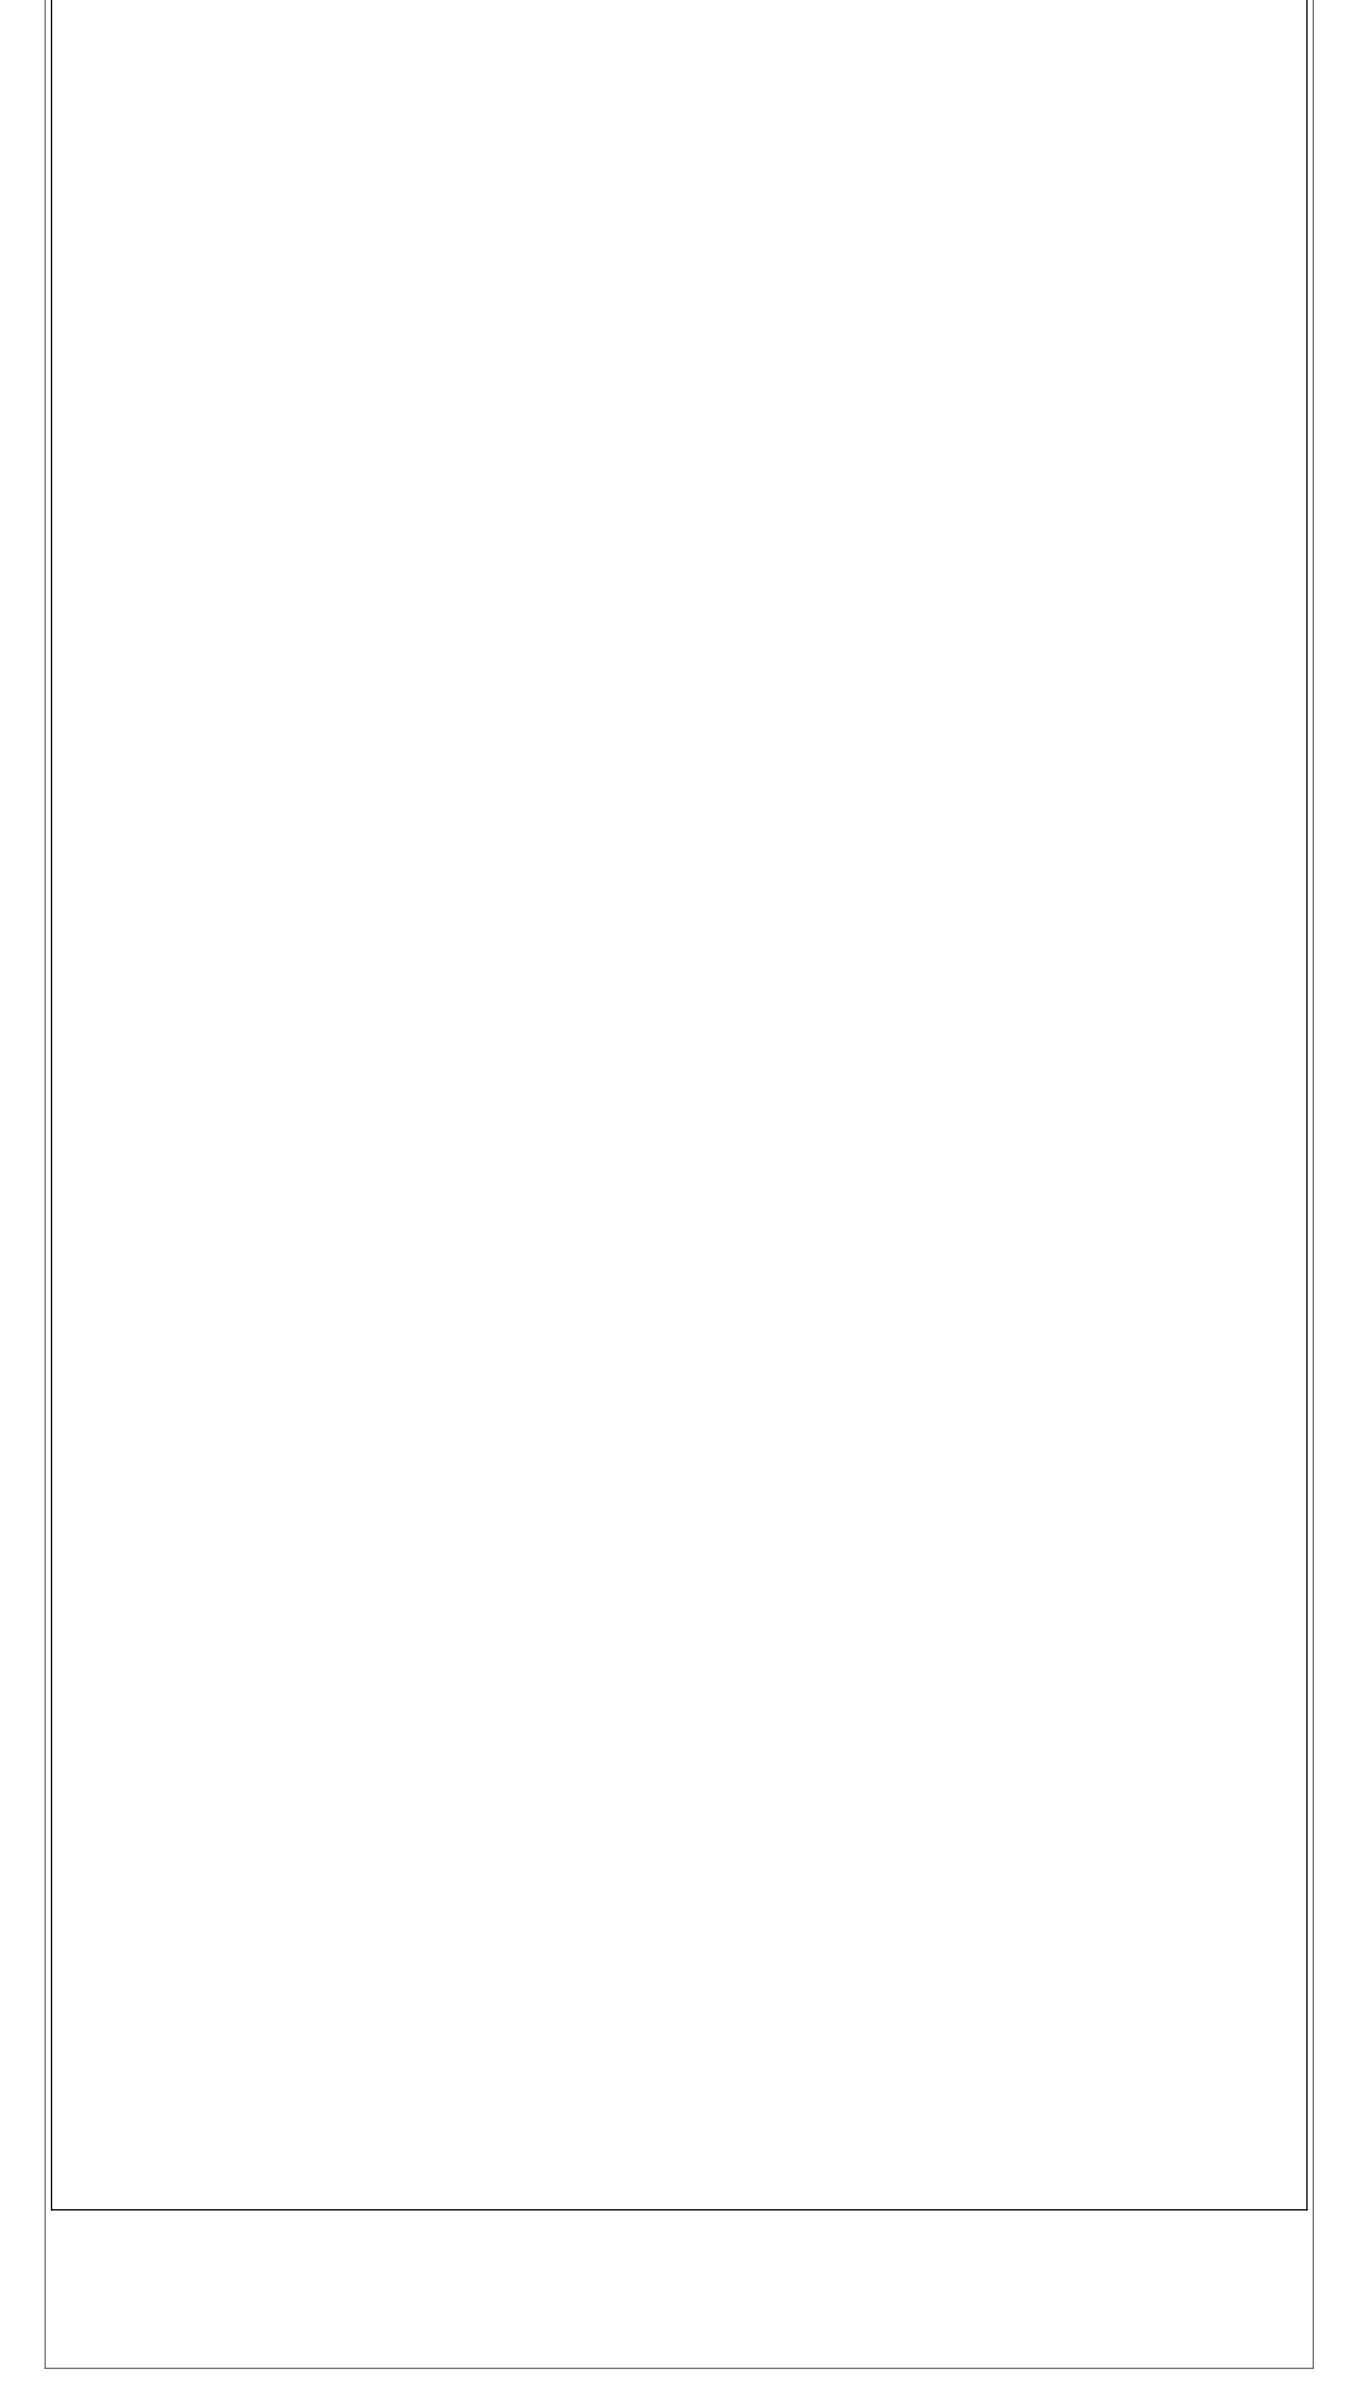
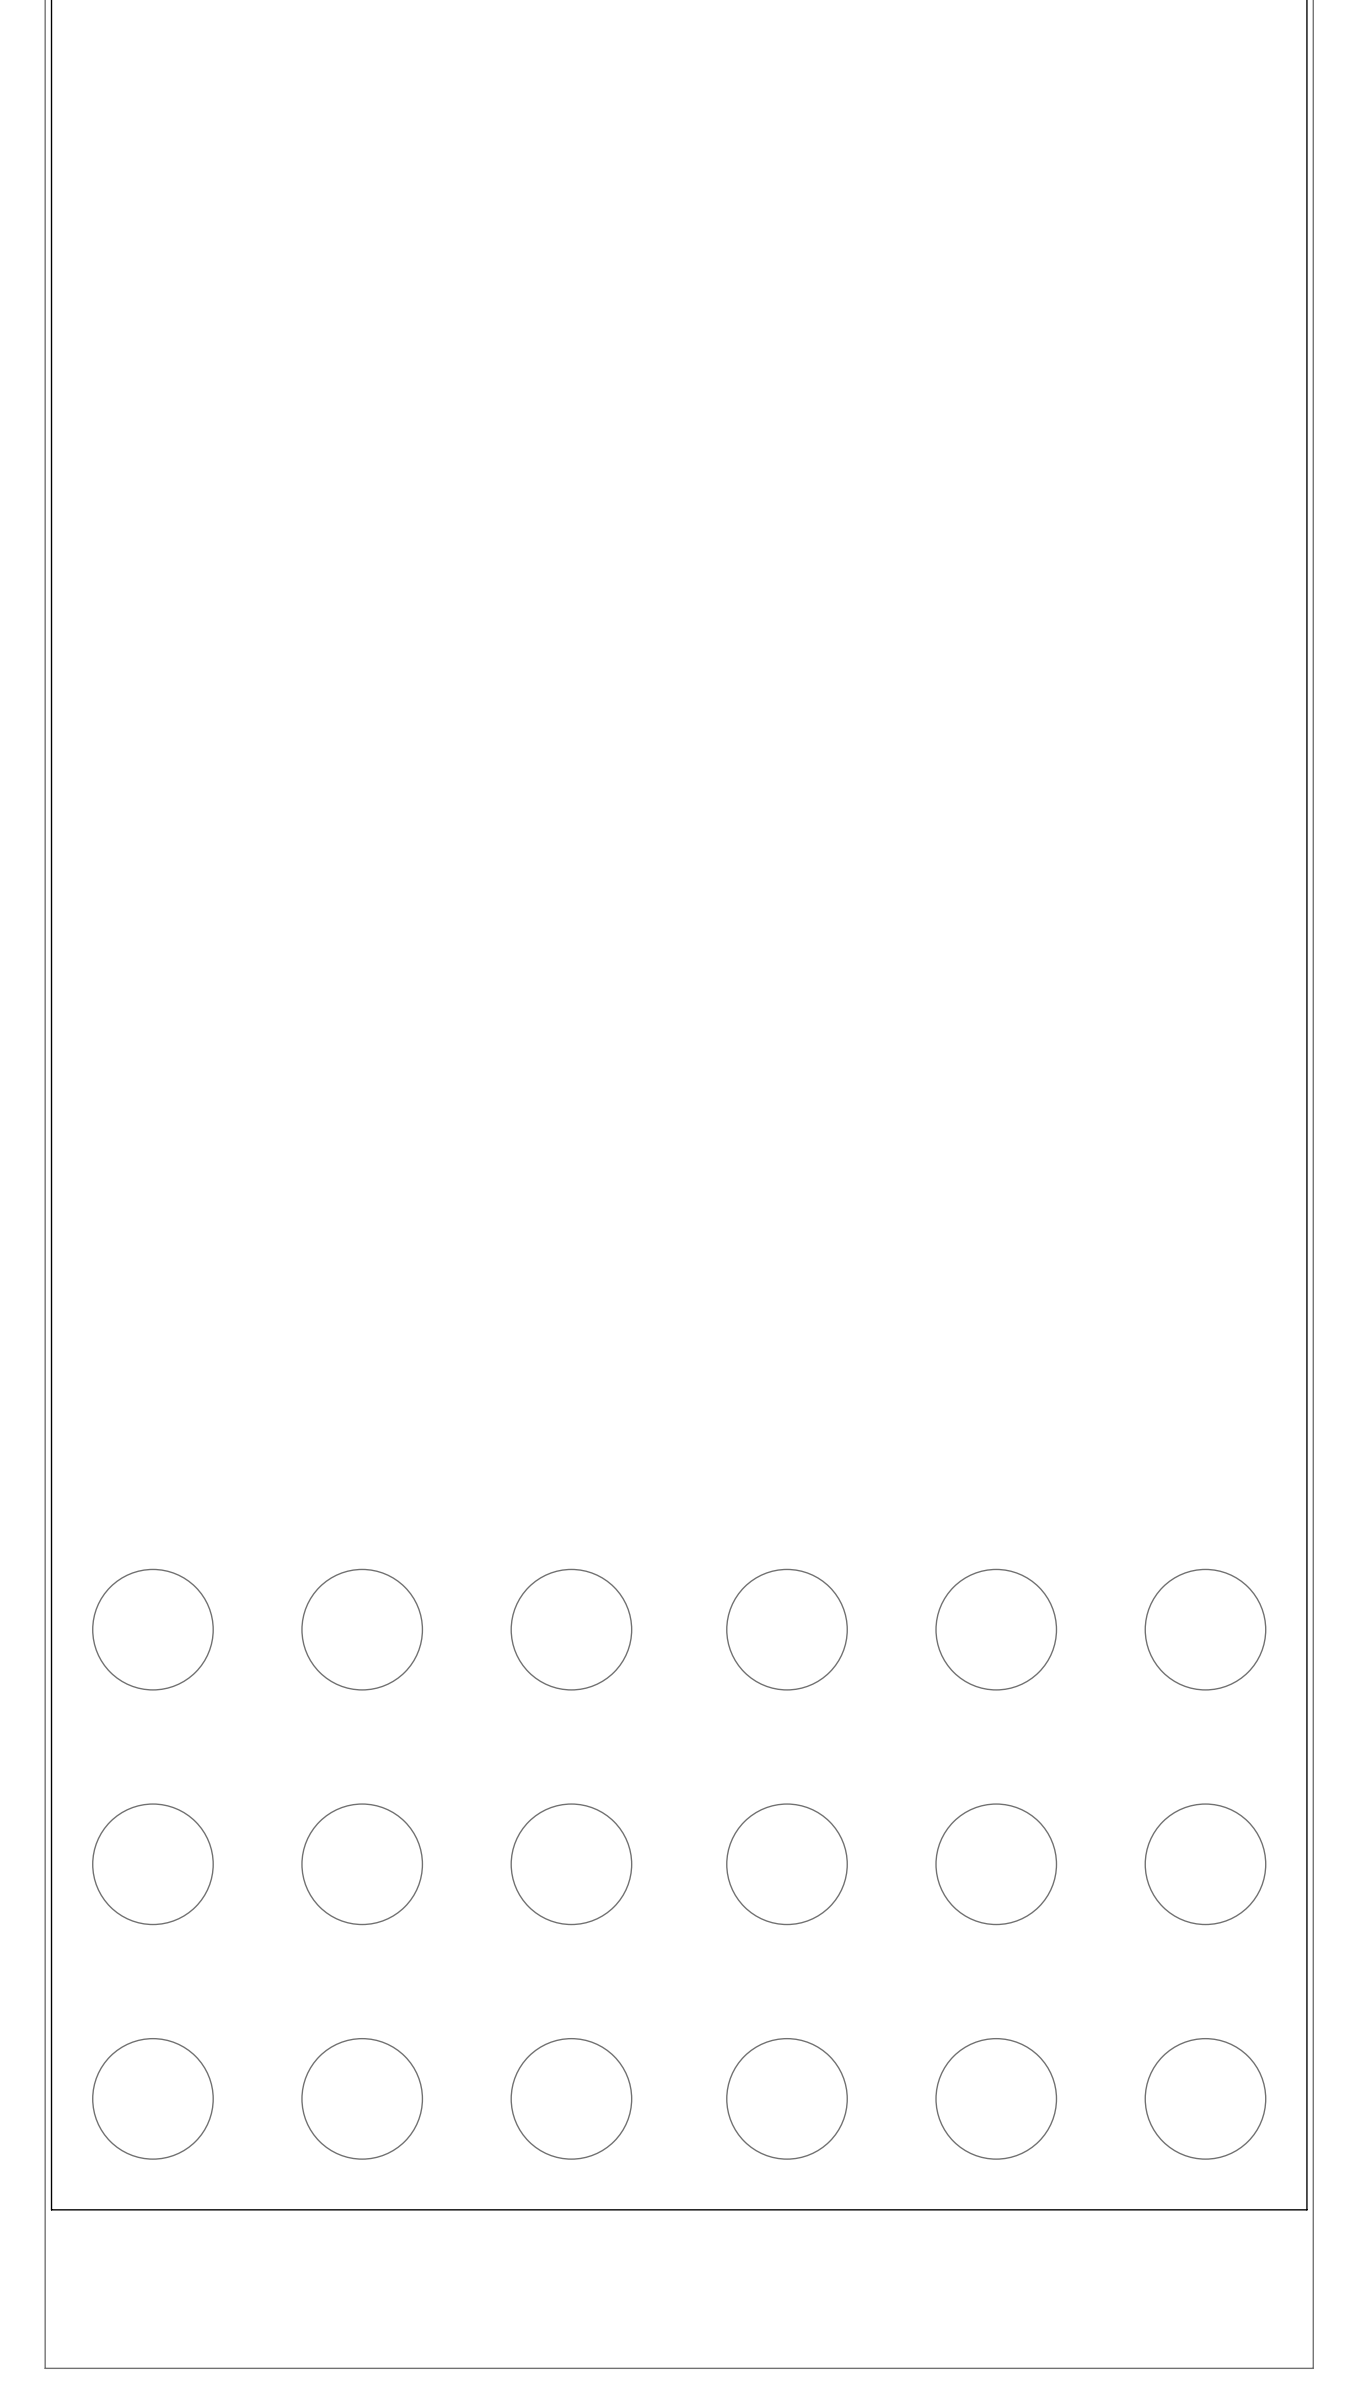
drawing: none -> [92, 1568, 214, 1691]
drawing: none -> [301, 1568, 424, 1691]
drawing: none -> [510, 1568, 633, 1691]
drawing: none -> [726, 1568, 848, 1691]
drawing: none -> [935, 1568, 1058, 1691]
drawing: none -> [1144, 1568, 1267, 1691]
drawing: none -> [92, 1803, 214, 1926]
drawing: none -> [301, 1803, 424, 1926]
drawing: none -> [510, 1803, 633, 1926]
drawing: none -> [726, 1803, 848, 1926]
drawing: none -> [935, 1803, 1058, 1926]
drawing: none -> [1144, 1803, 1267, 1926]
drawing: none -> [92, 2038, 214, 2160]
drawing: none -> [301, 2038, 424, 2160]
drawing: none -> [510, 2038, 633, 2160]
drawing: none -> [726, 2038, 848, 2160]
drawing: none -> [935, 2038, 1058, 2160]
drawing: none -> [1144, 2038, 1267, 2160]

